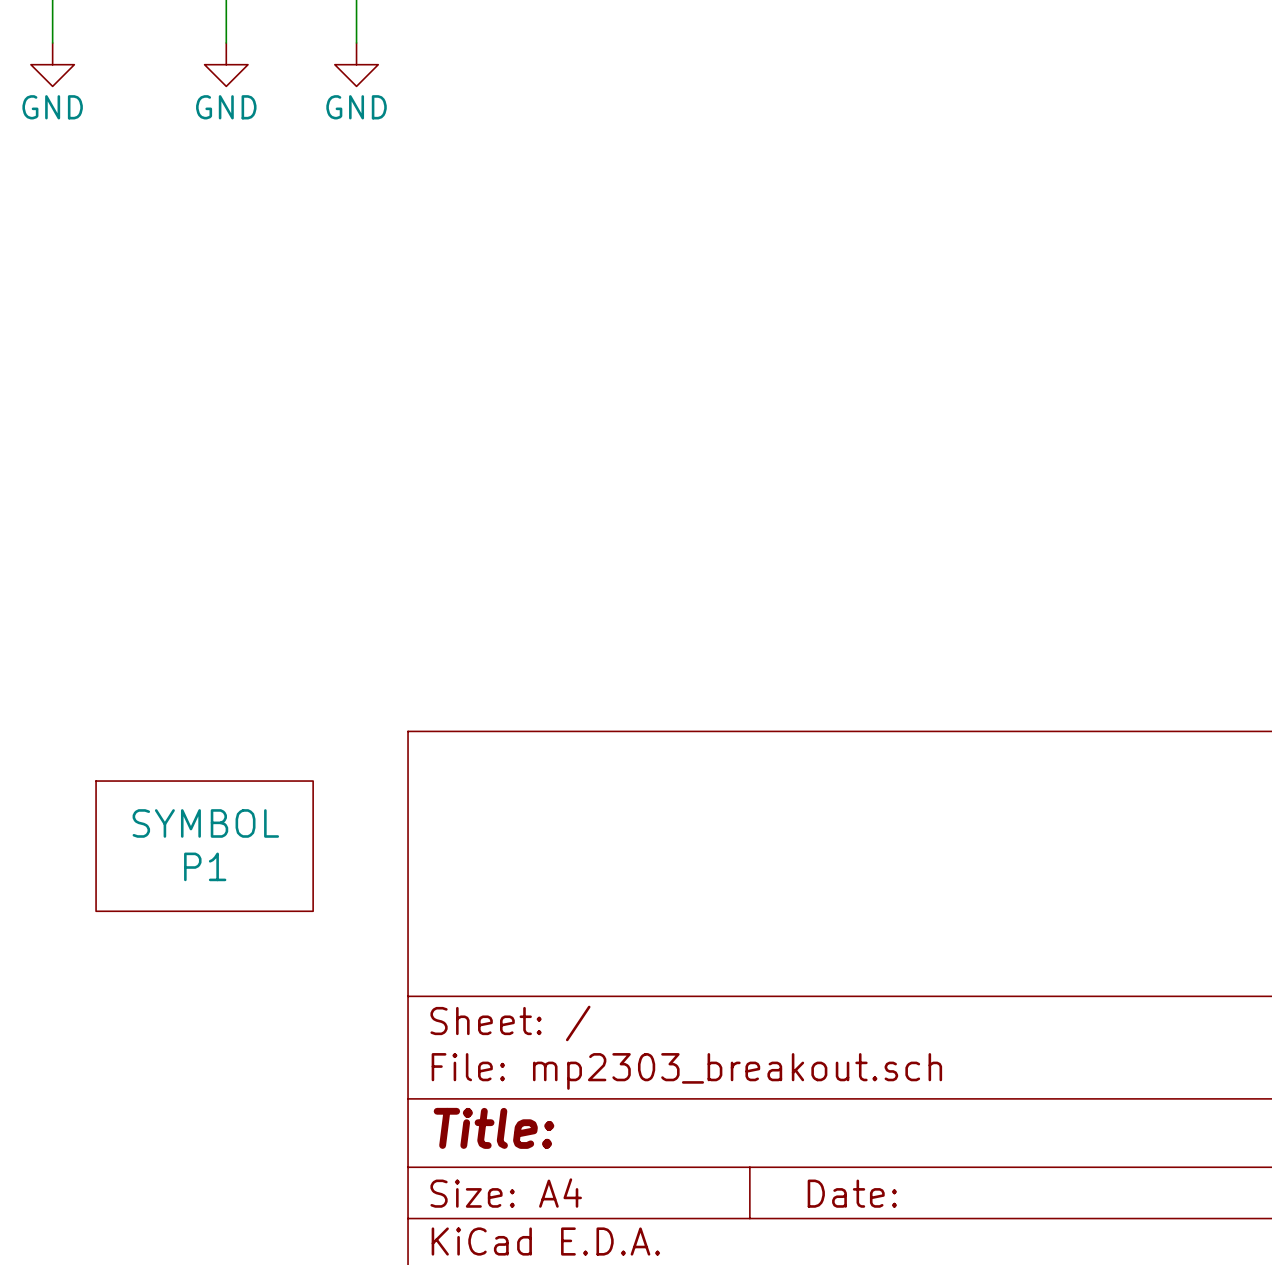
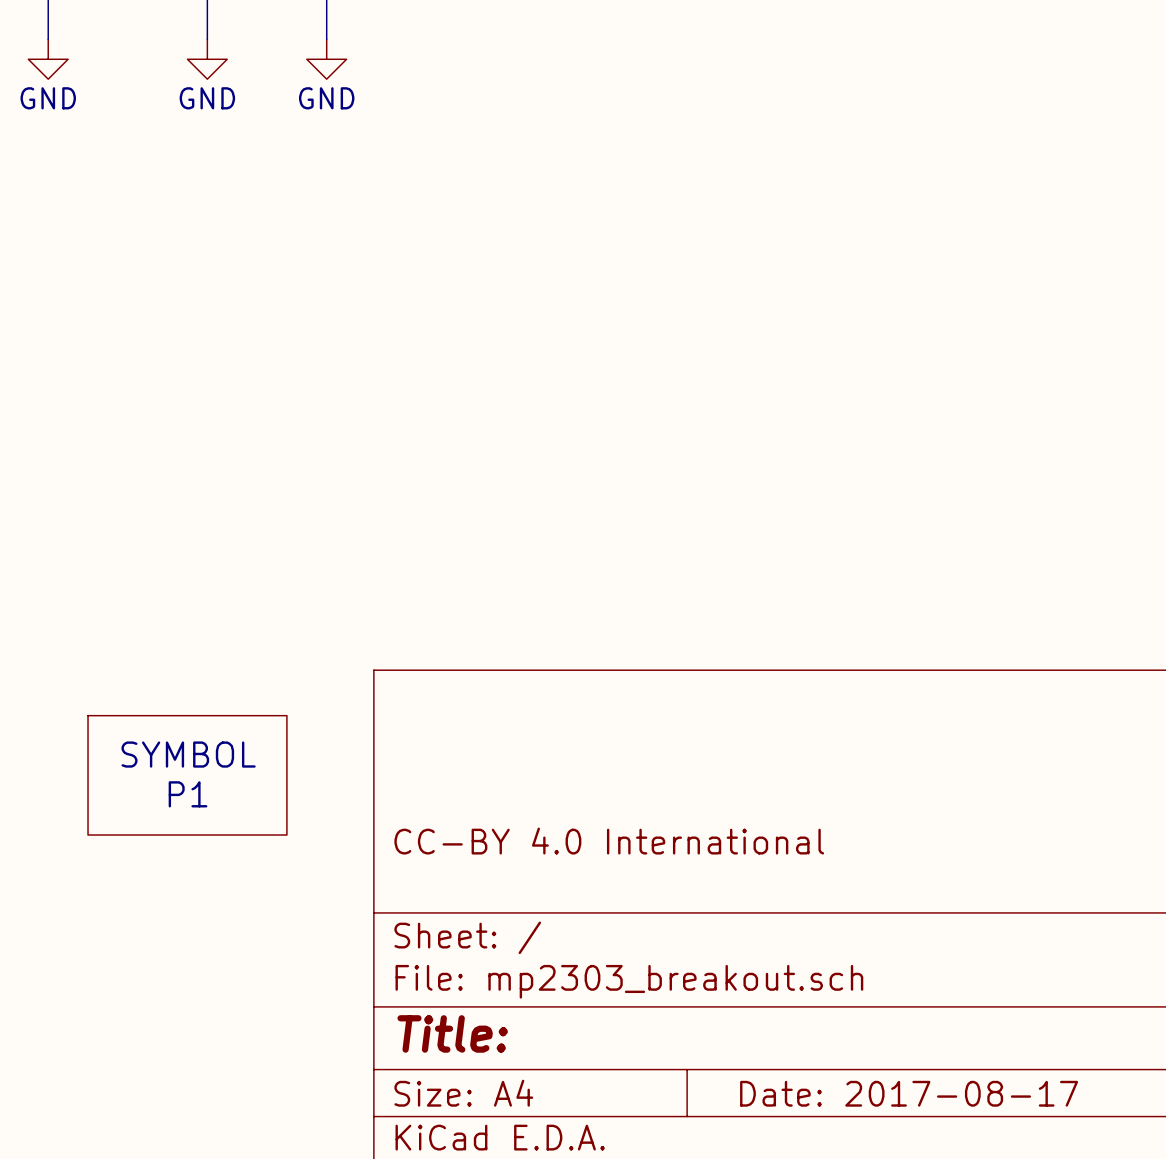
title block: none -> CC-BY 4.0 International (609, 841)
title block: Date: (852, 1193) -> Date: 2017-08-17 (909, 1093)

